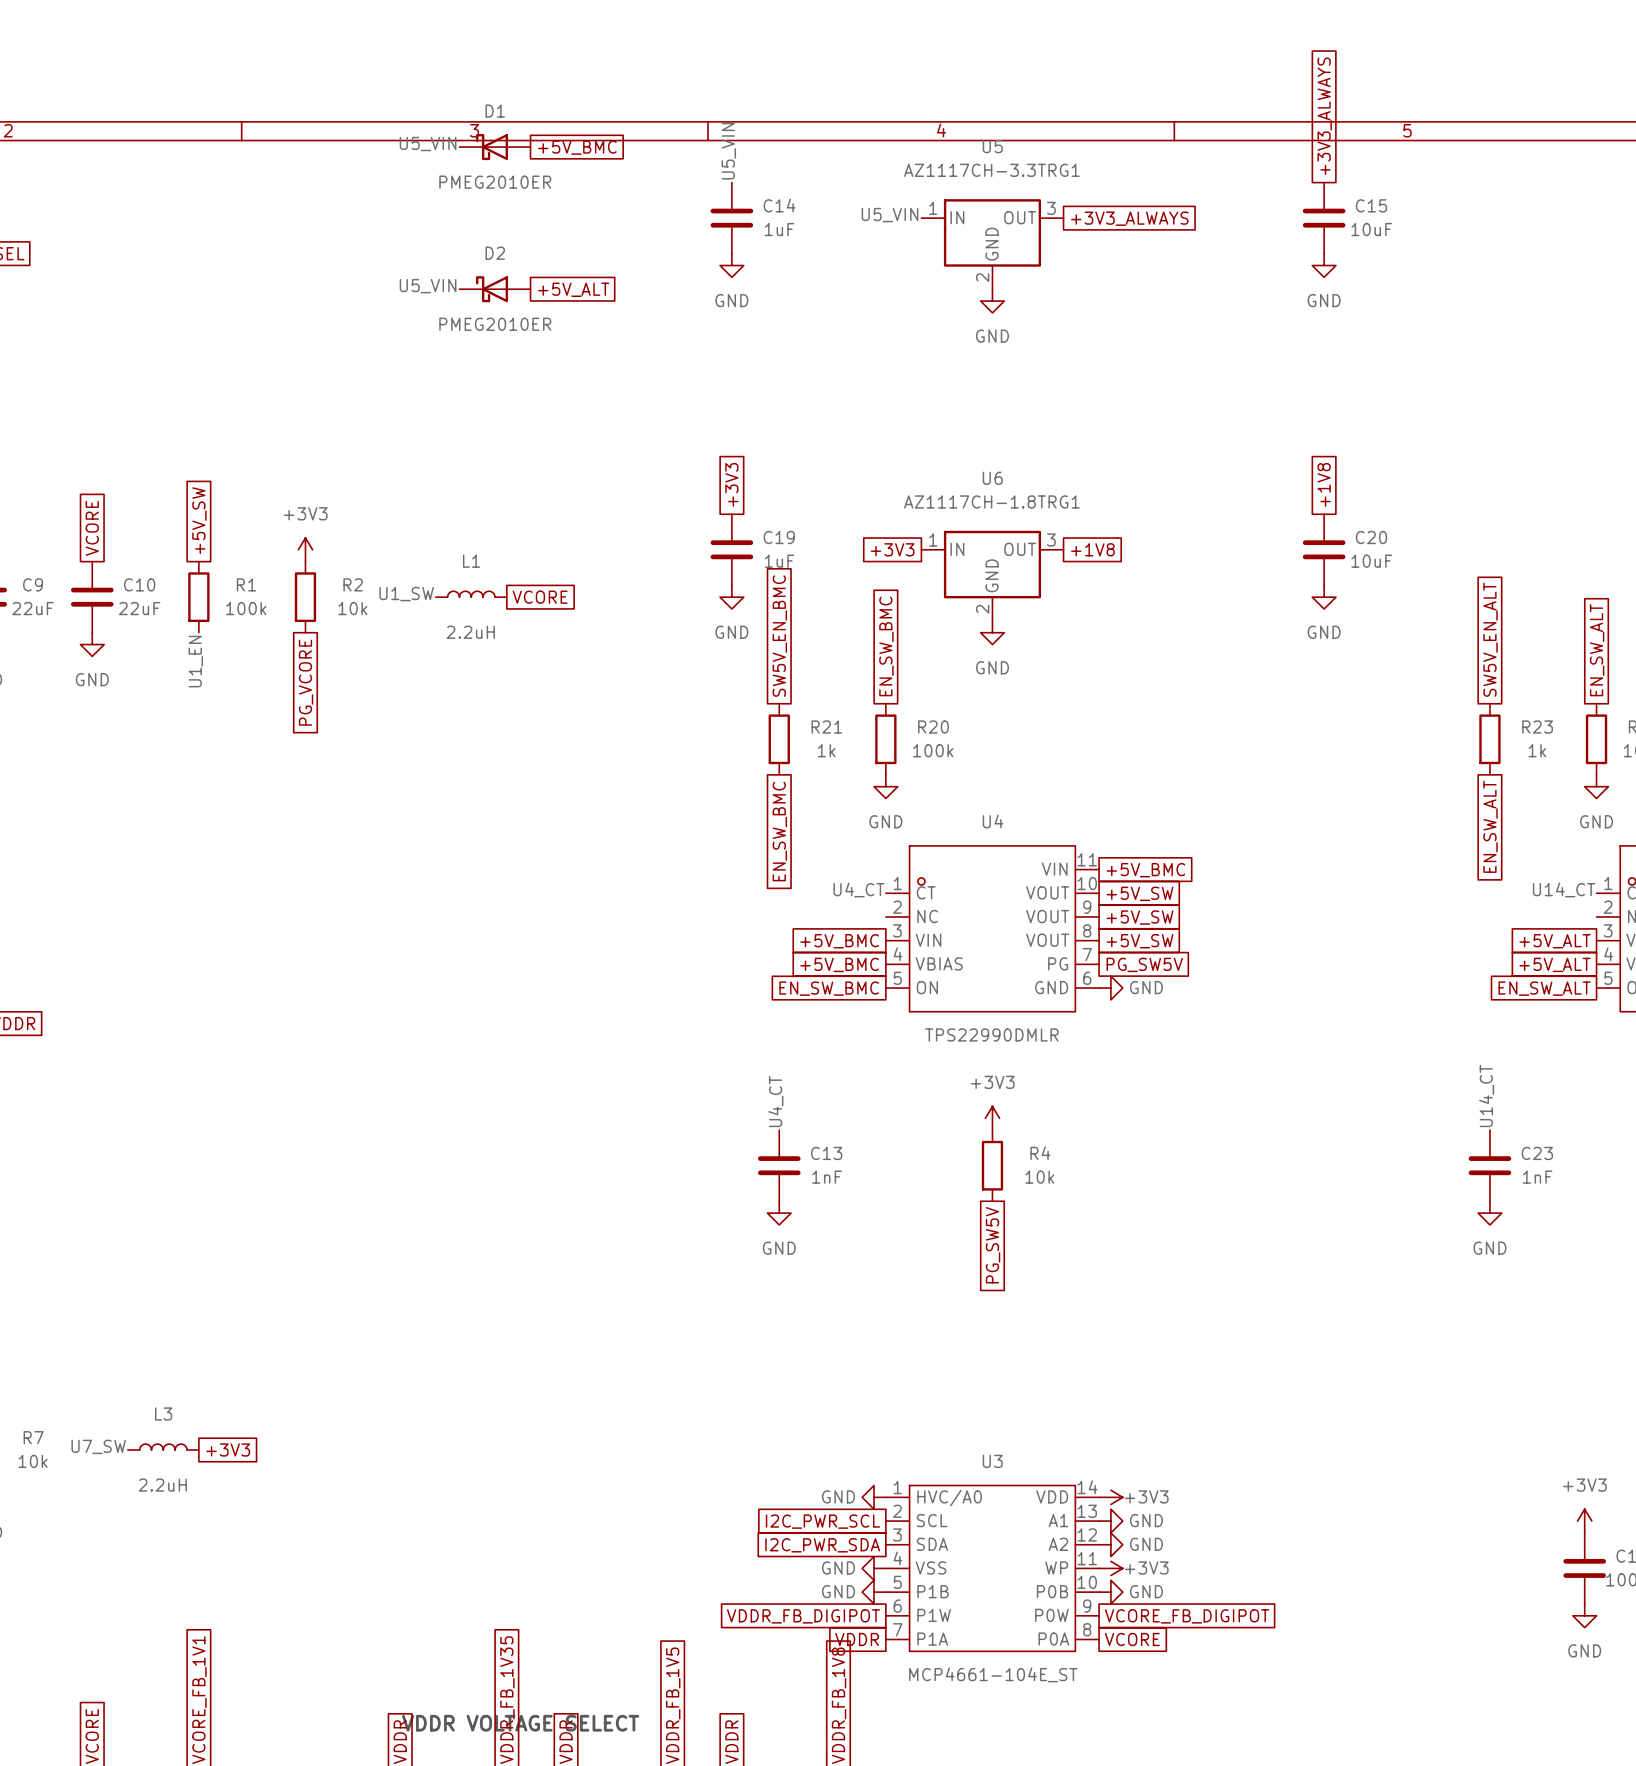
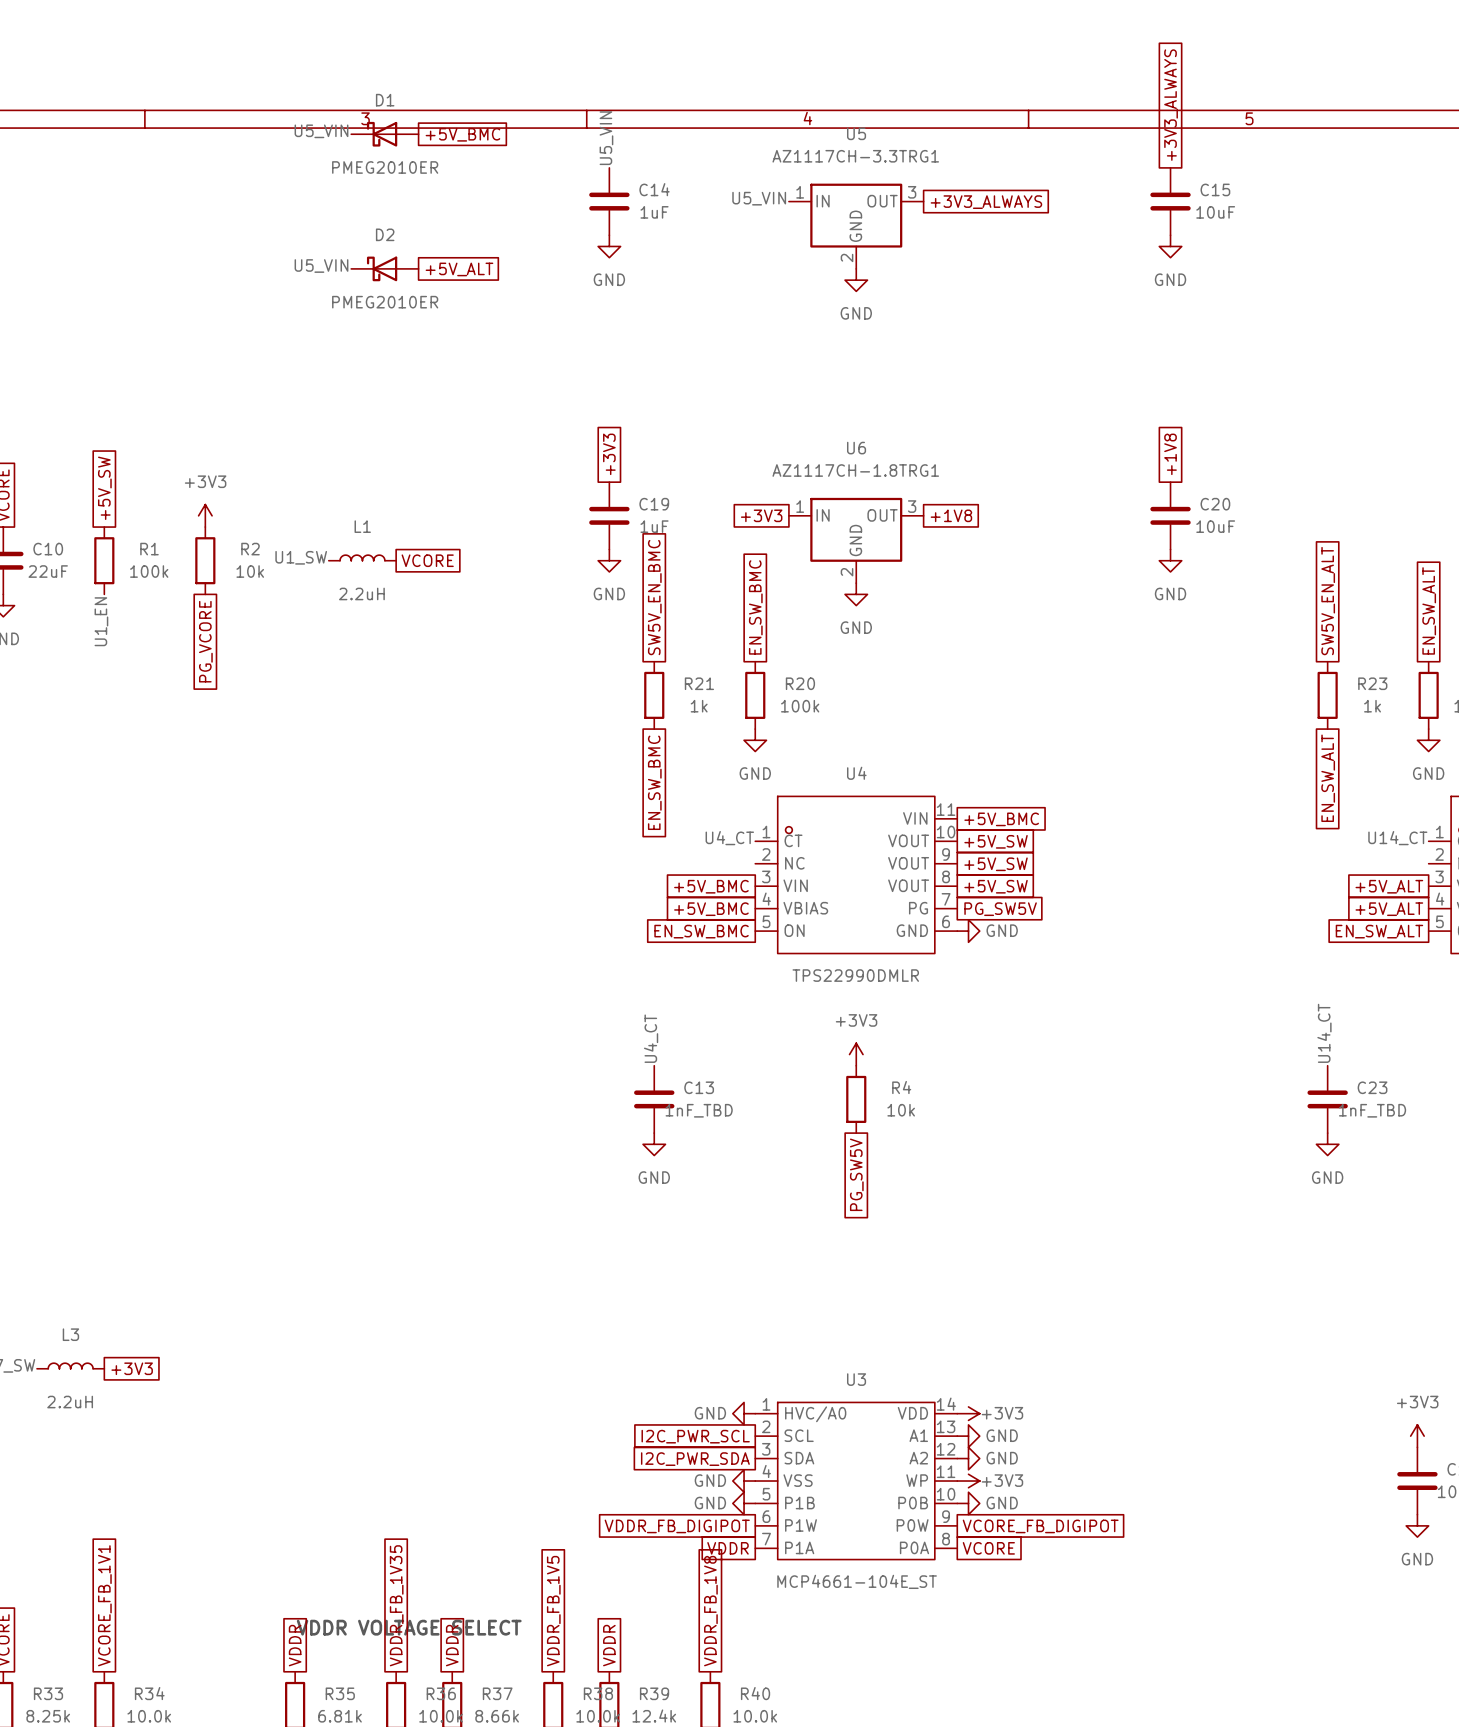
C13 value: 1nF (826, 1177) -> 1nF_TBD (699, 1110)
C23 value: 1nF (1537, 1177) -> 1nF_TBD (1372, 1110)

